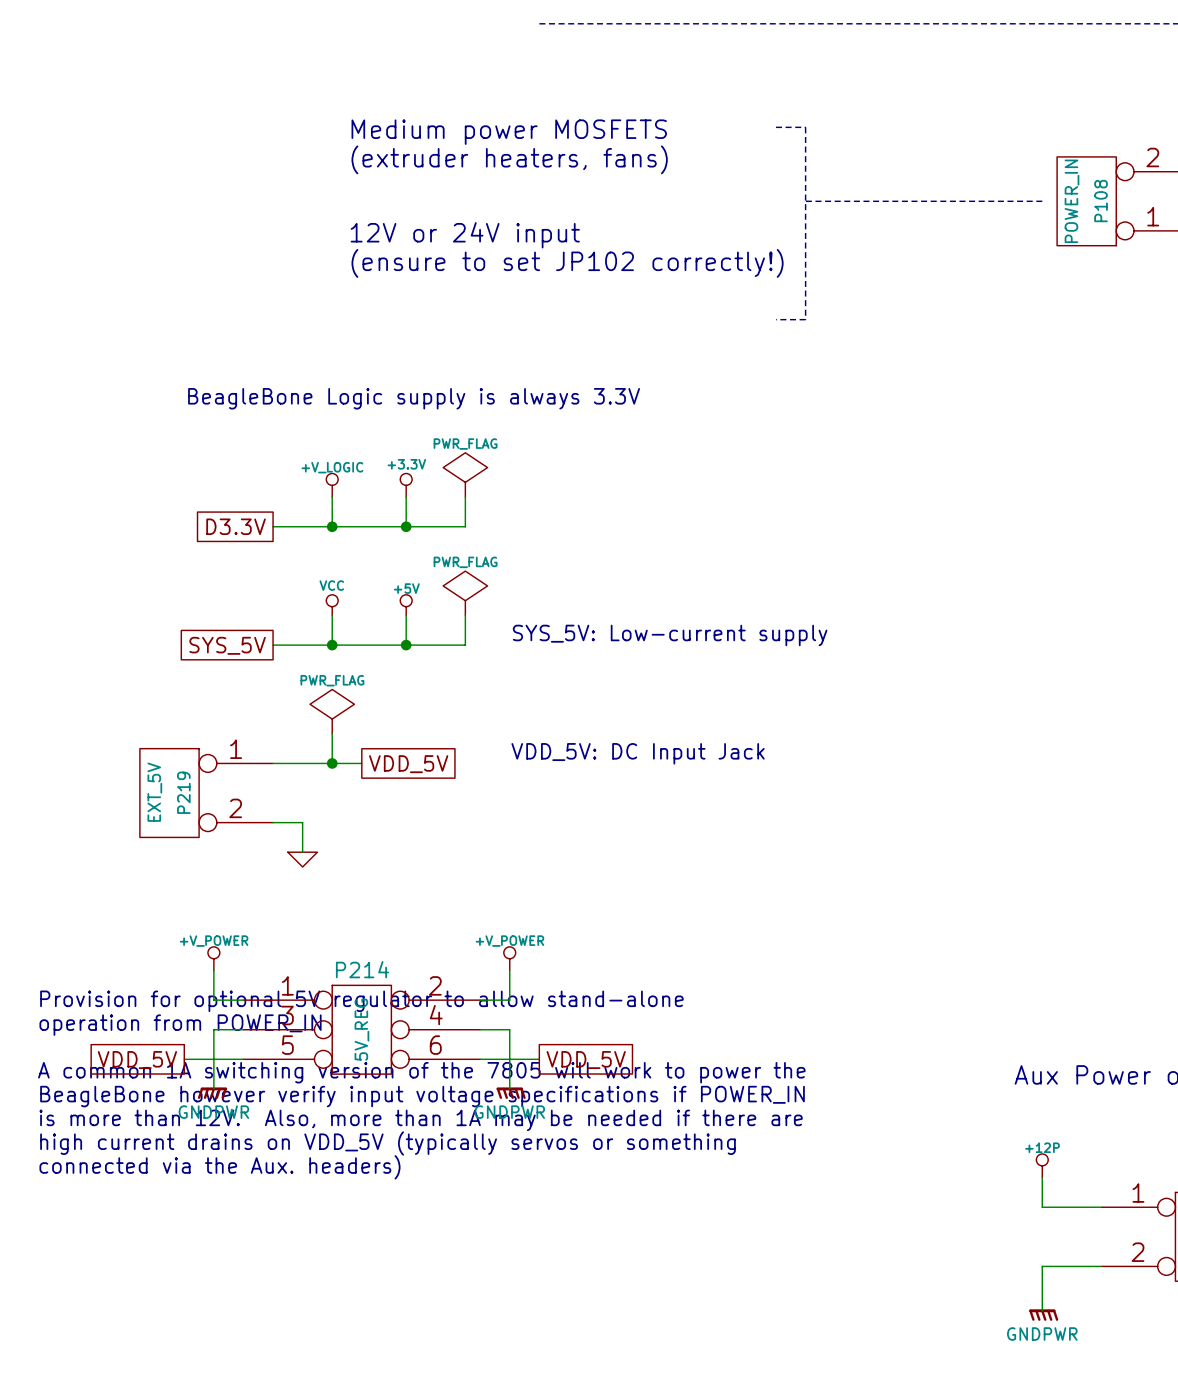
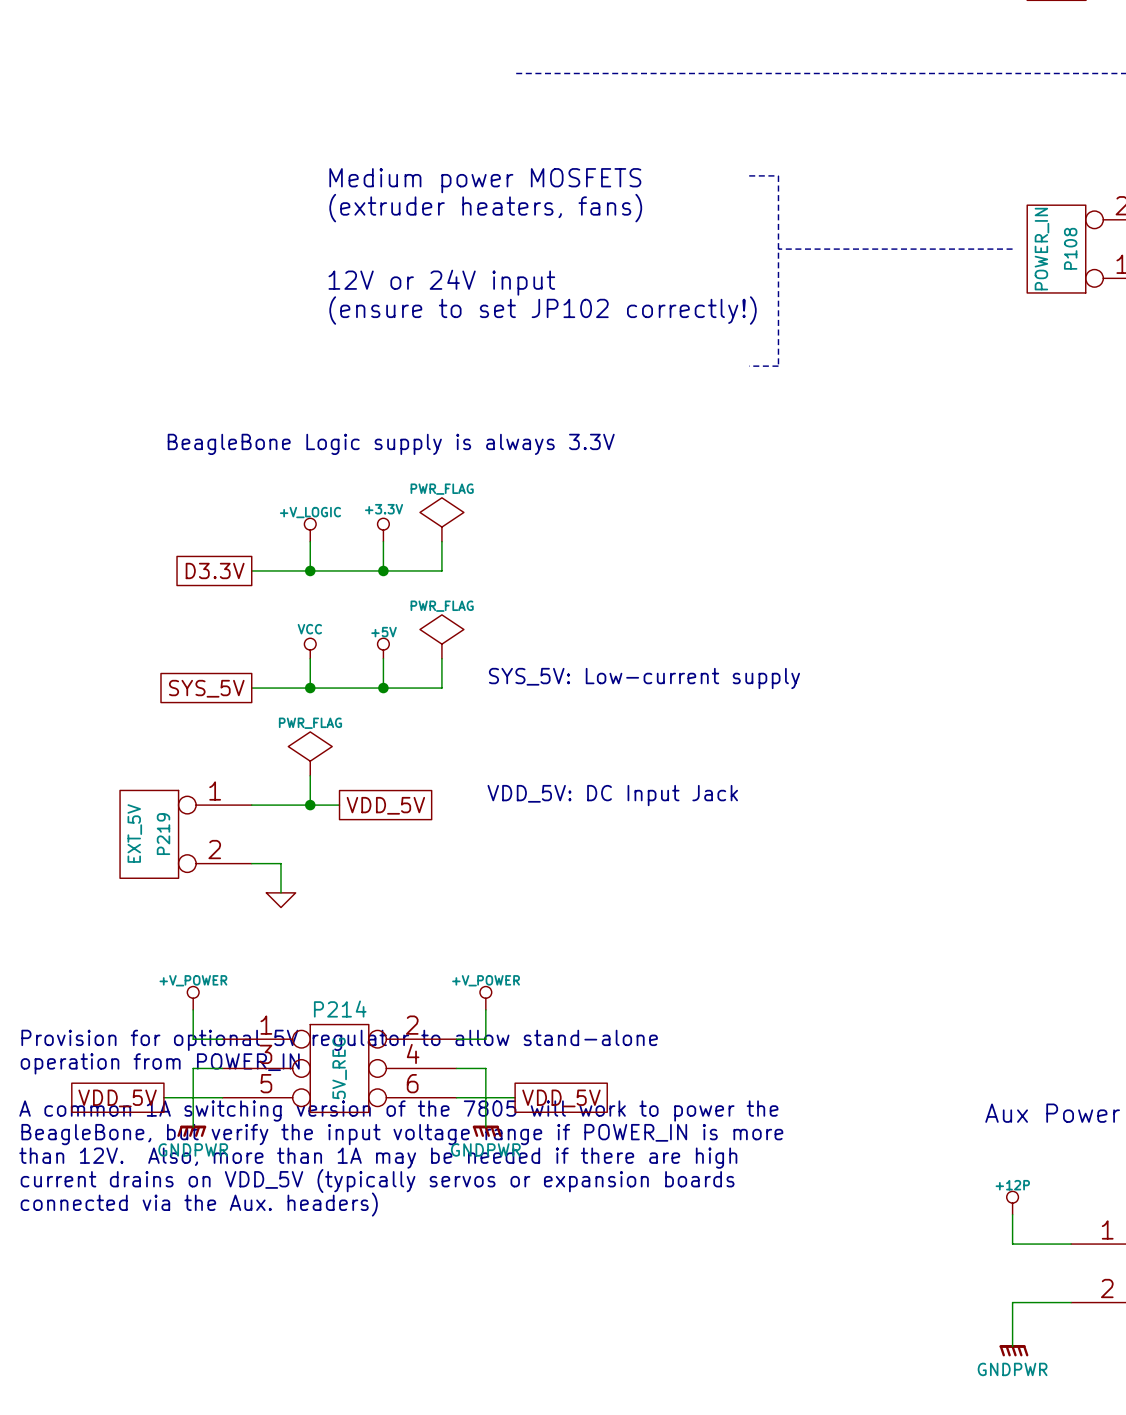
text: BeagleBone however verify input voltage specifications if POWER_IN (422, 1096) -> BeagleBone, but verify the input voltage range if POWER_IN is more (402, 1134)
text: is more than 12V. Also, more than 1A may be needed if there are (421, 1120) -> than 12V. Also, more than 1A may be needed if there are high (378, 1158)
text: high current drains on VDD_5V (typically servos or something (387, 1143) -> current drains on VDD_5V (typically servos or expansion boards (377, 1180)

